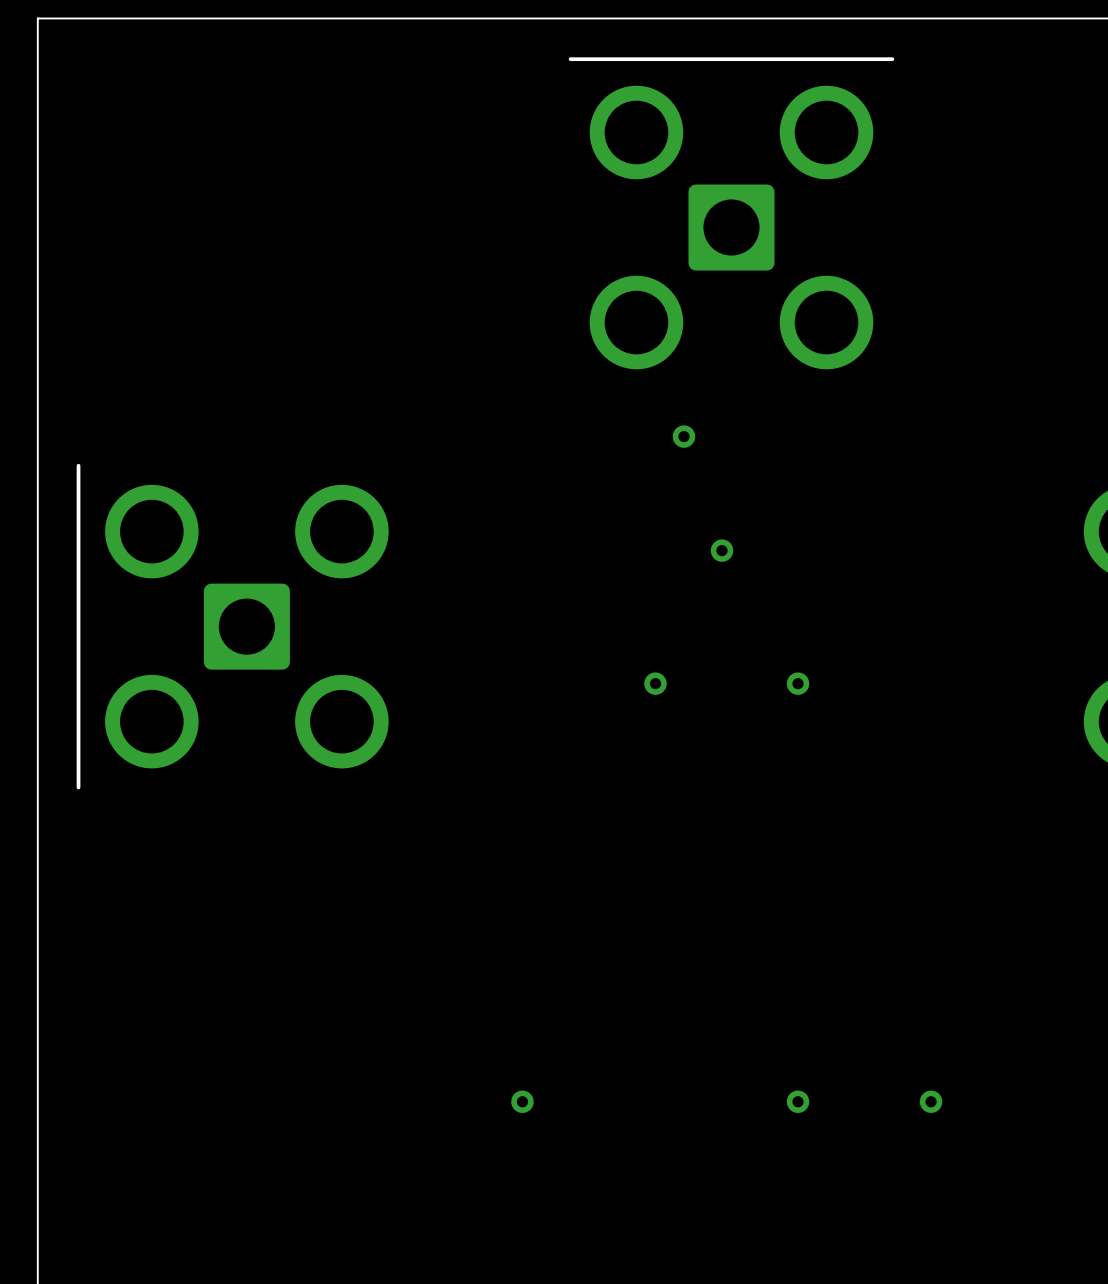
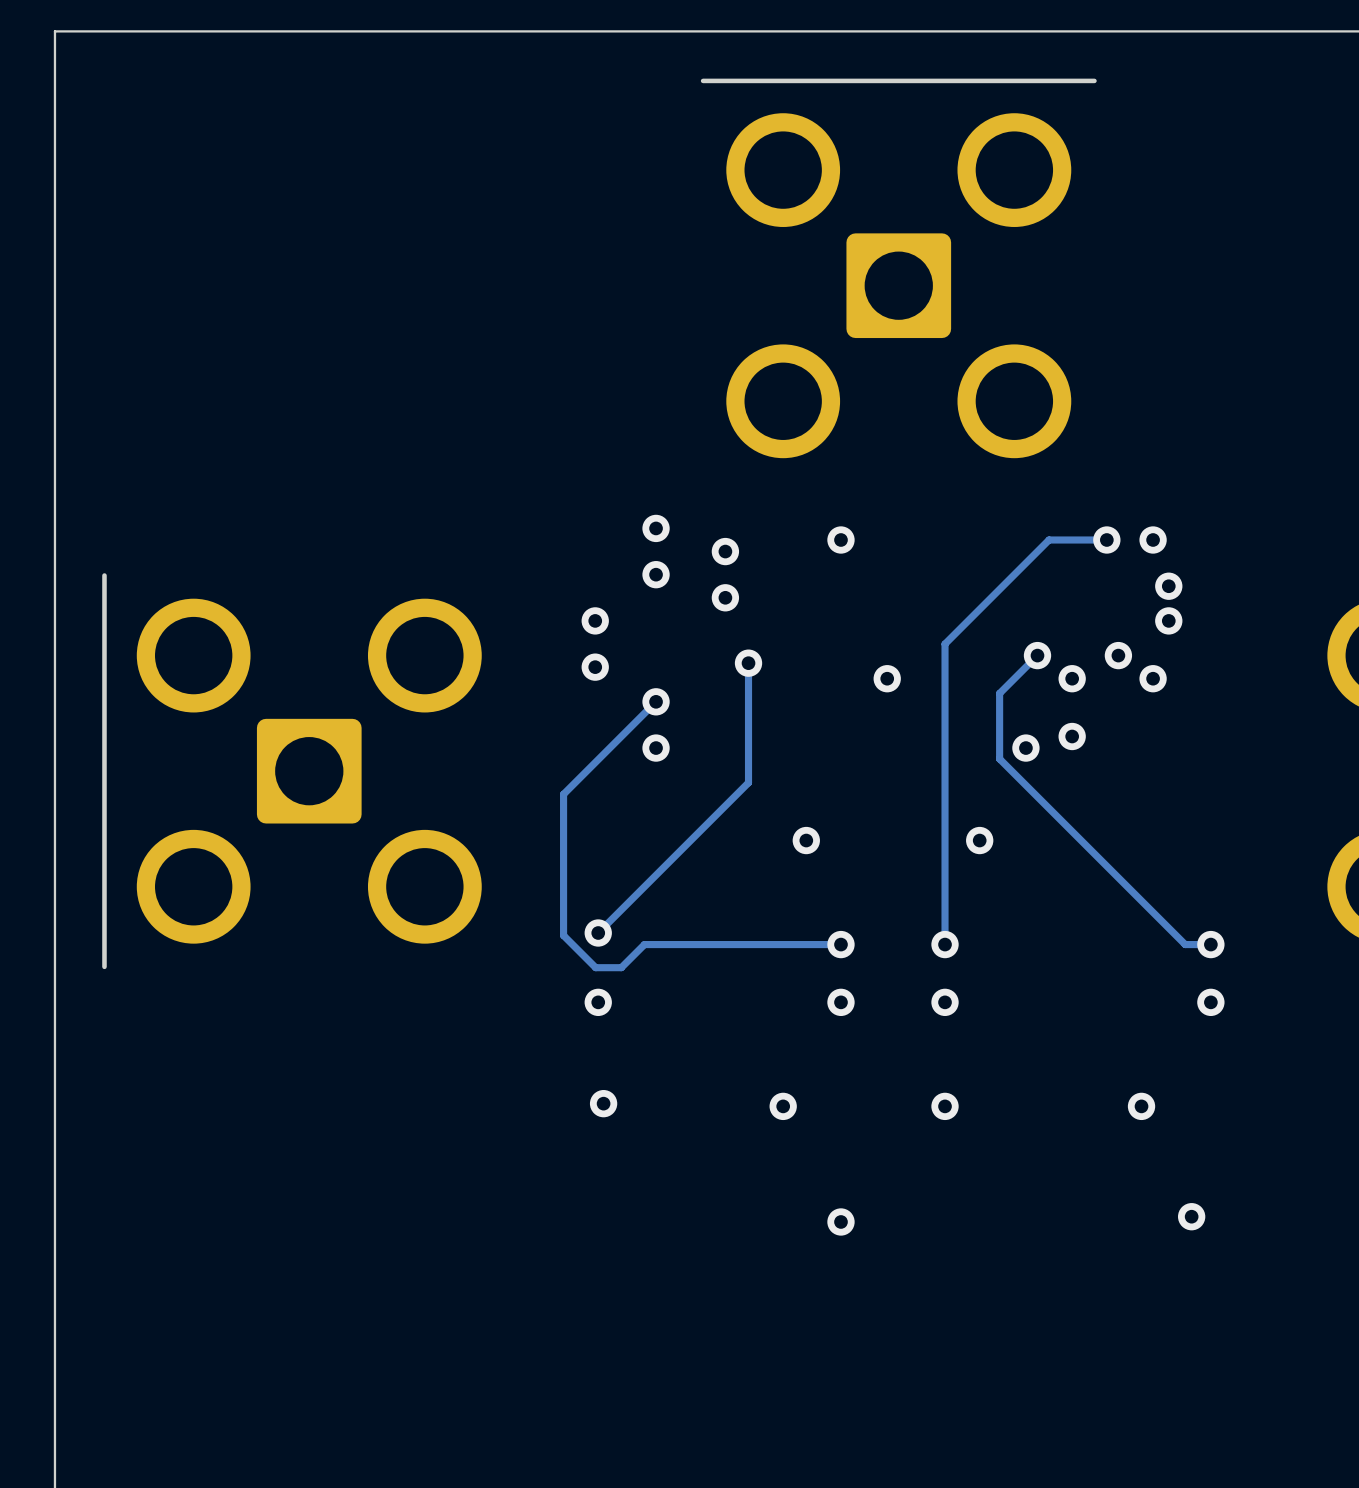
via: none -> (656, 528)
track: none -> (1106, 539) (1049, 539) (945, 644) (945, 944)
via: none -> (1106, 539)
via: none -> (1153, 539)
via: none -> (725, 551)
via: none -> (656, 574)
via: none -> (1168, 586)
via: none -> (725, 597)
via: none -> (595, 620)
via: none -> (1168, 620)
track: none -> (1037, 655) (999, 693) (999, 758) (1185, 944) (1210, 944)
via: none -> (1037, 655)
via: none -> (1118, 655)
track: none -> (748, 663) (748, 782) (598, 933)
via: none -> (748, 663)
via: none -> (595, 667)
via: none -> (1072, 678)
via: none -> (1153, 678)
track: none -> (656, 701) (563, 794) (563, 935) (595, 967) (621, 967) (644, 944) (840, 944)
via: none -> (656, 701)
via: none -> (1072, 736)
via: none -> (656, 748)
via: none -> (1025, 748)
via: none -> (598, 933)
via: none -> (840, 944)
via: none -> (945, 944)
via: none -> (1210, 944)
via: none -> (598, 1002)
via: none -> (840, 1002)
via: none -> (945, 1002)
via: none -> (1210, 1002)
via: none -> (603, 1103)
via: none -> (783, 1106)
via: none -> (945, 1106)
via: none -> (1141, 1106)
via: none -> (1191, 1216)
via: none -> (840, 1221)
via: (522, 1101) -> none
via: (798, 1101) -> none
via: (931, 1101) -> none

